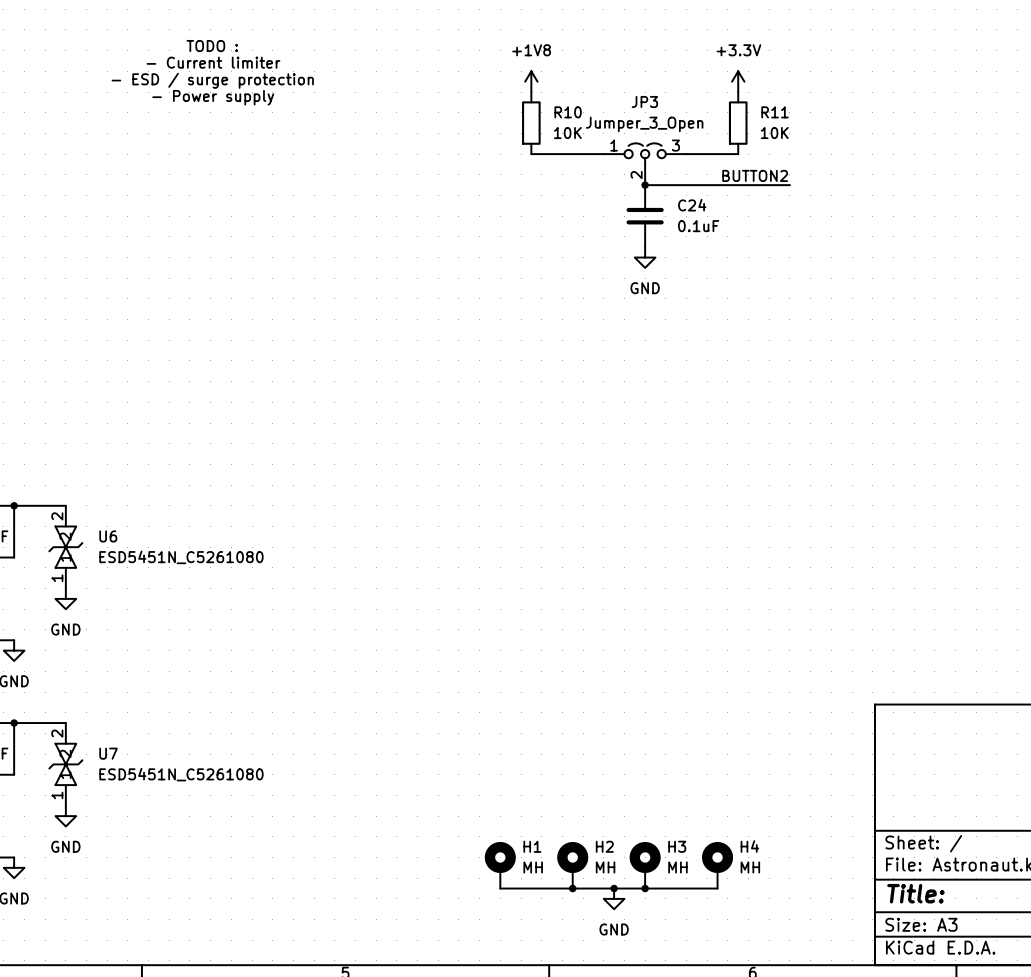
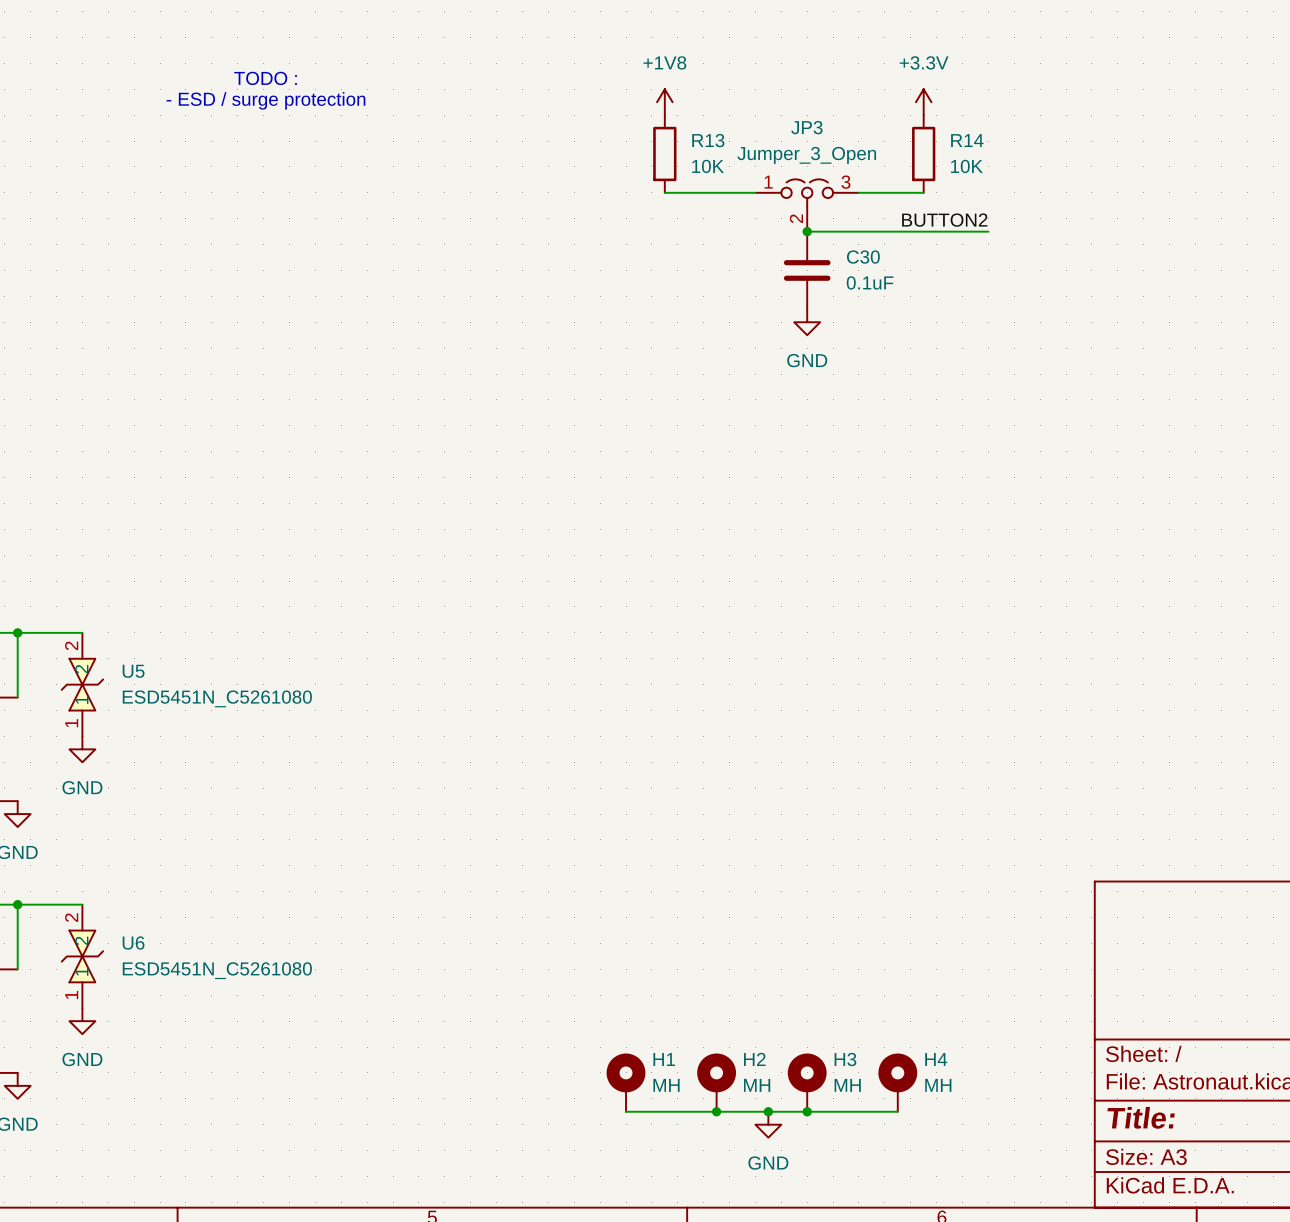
text: TODO : (212, 46) -> none
text: - Current limiter (213, 62) -> TODO : (265, 78)
text: - Power supply (213, 97) -> none
R10 name: R10 (568, 112) -> R13 (708, 140)
R11 name: R11 (775, 112) -> R14 (967, 140)
C24 name: C24 (692, 205) -> C30 (863, 257)
U6 name: U6 (108, 536) -> U5 (133, 671)
U7 name: U7 (108, 753) -> U6 (133, 943)

